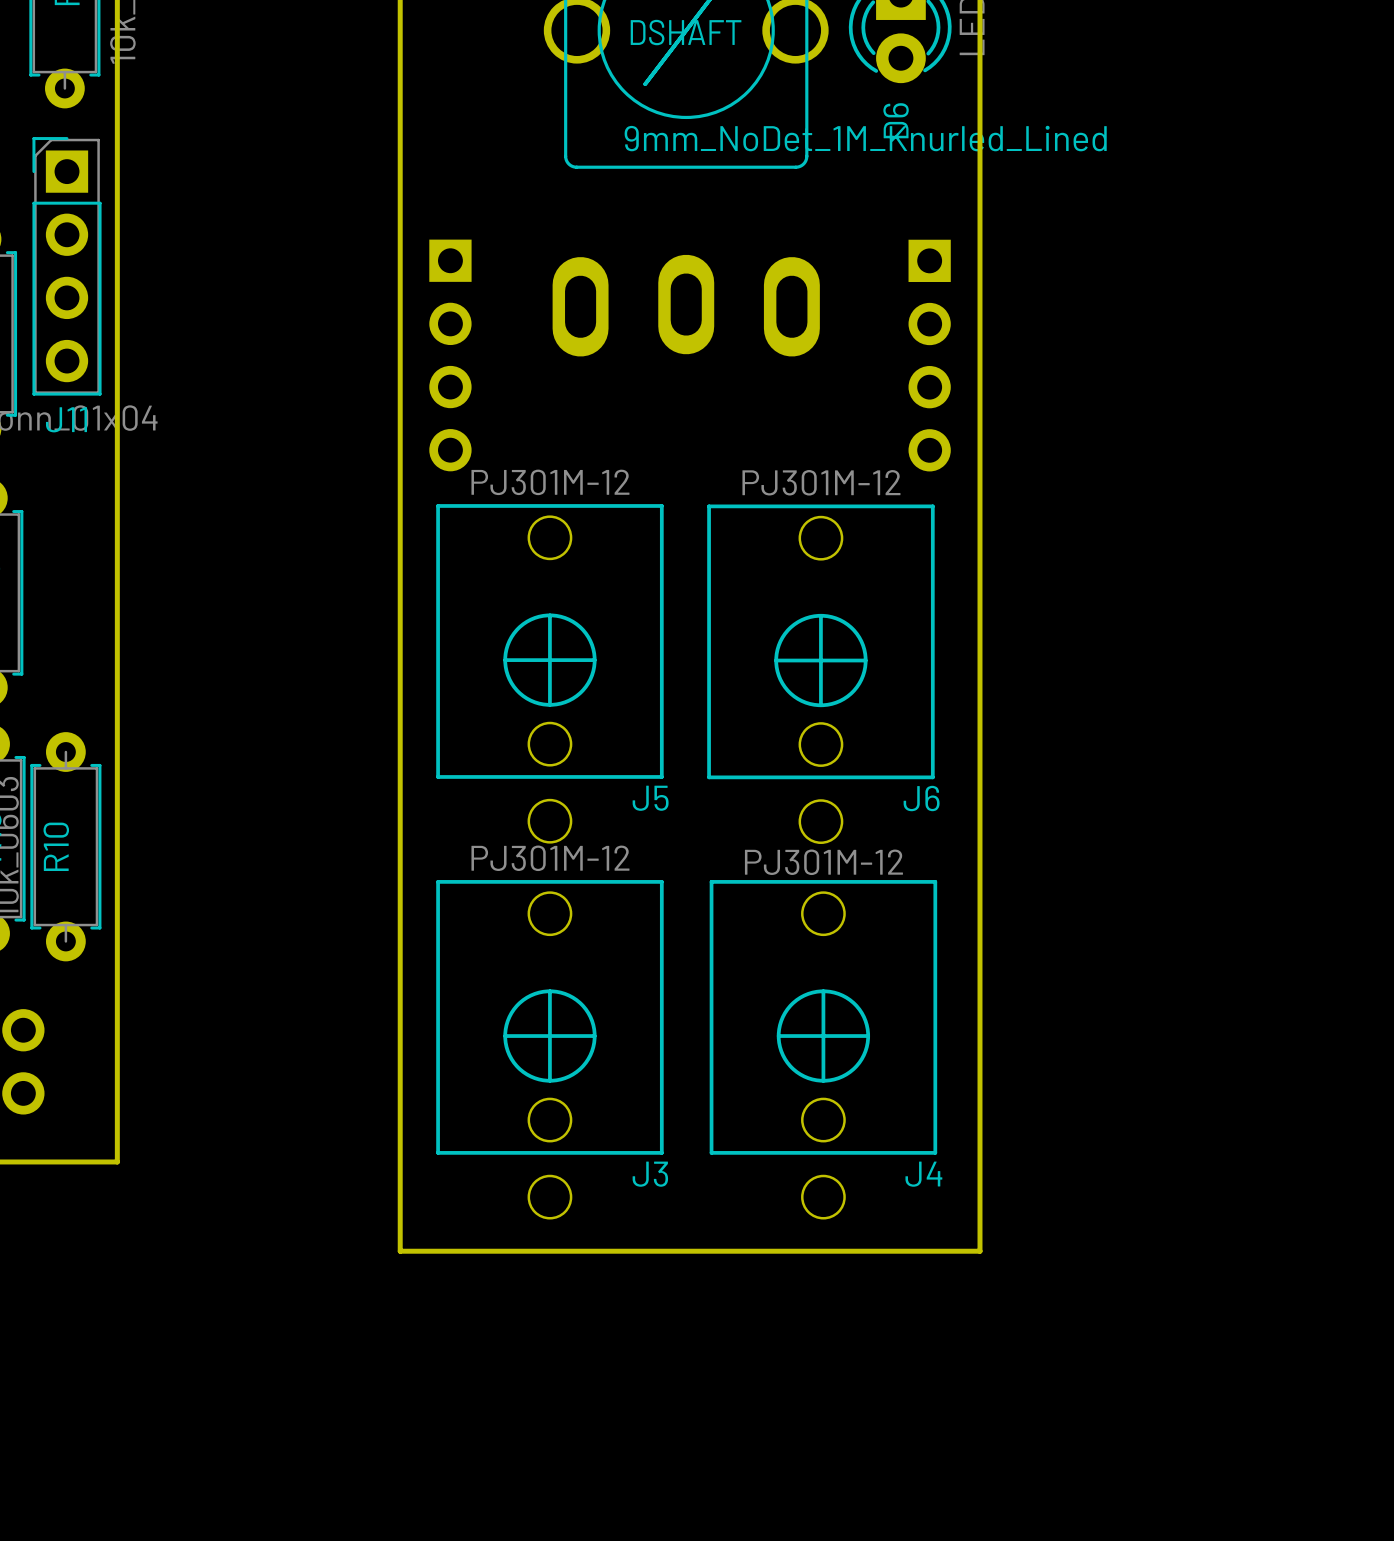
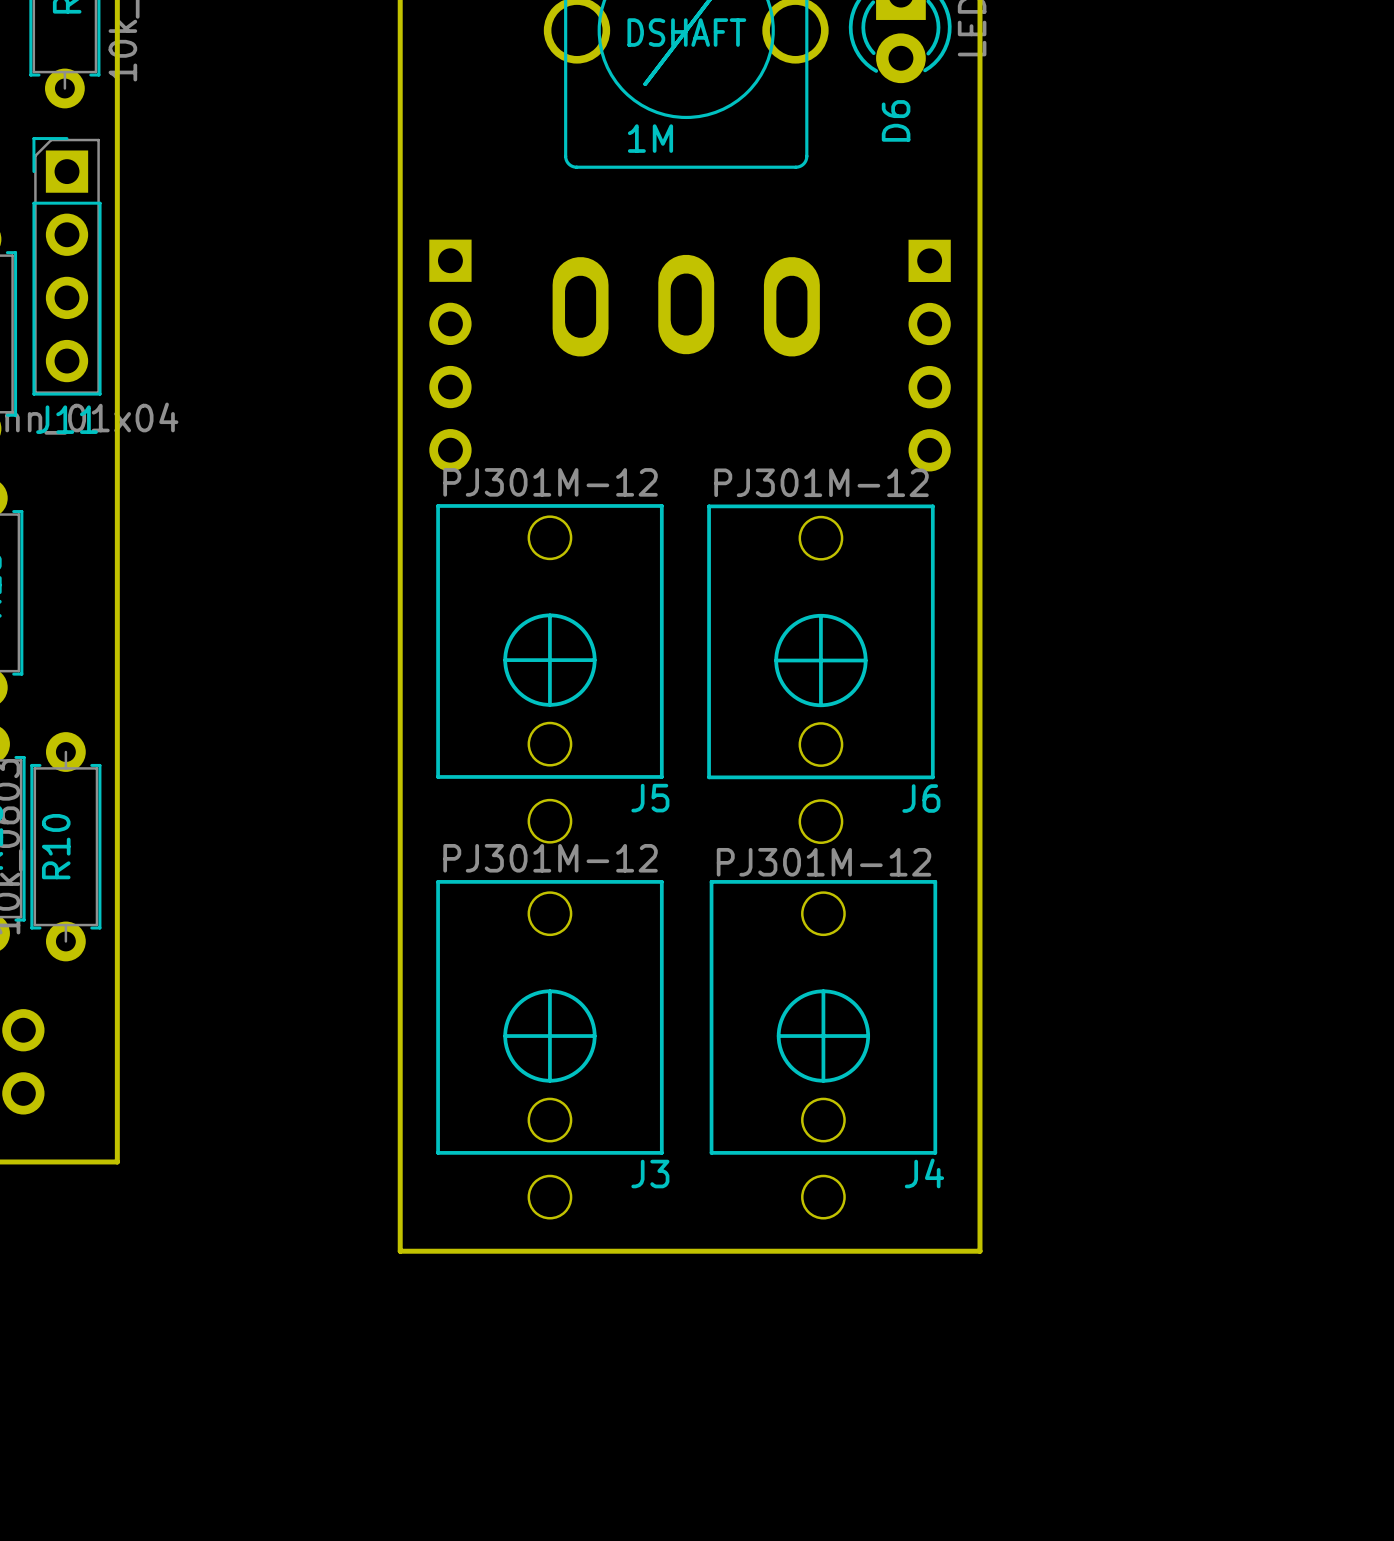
part value: 9mm_NoDet_1M_Knurled_Lined (865, 138) -> 1M (650, 138)

